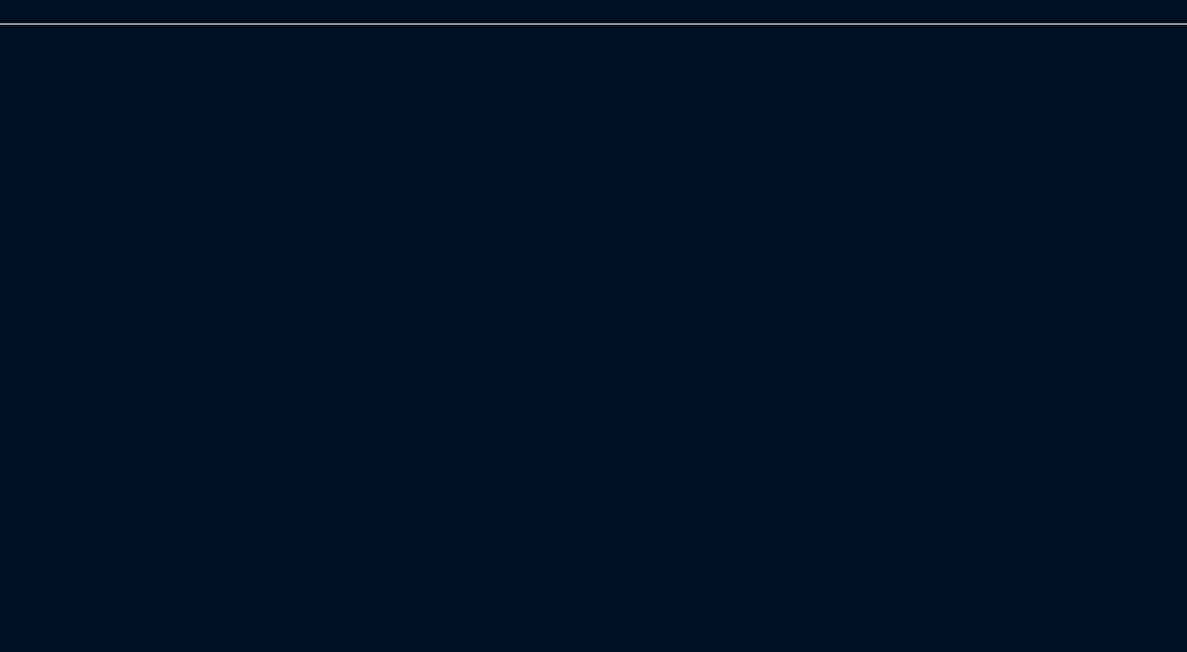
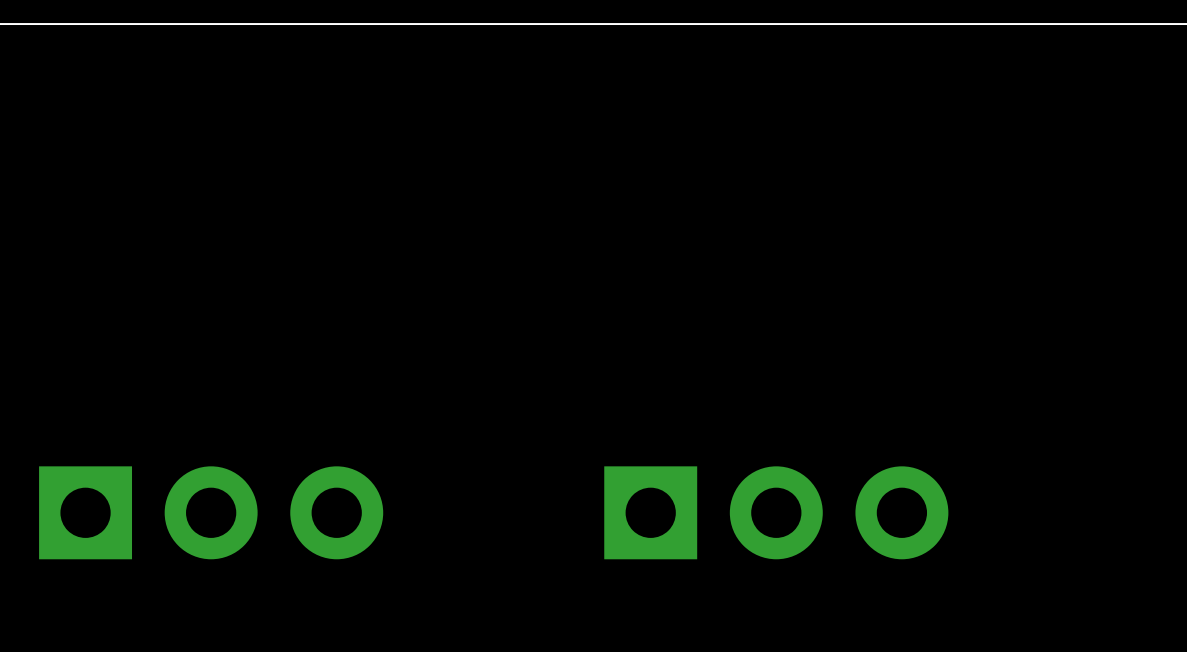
part: none -> (211, 512)
part: none -> (776, 512)

